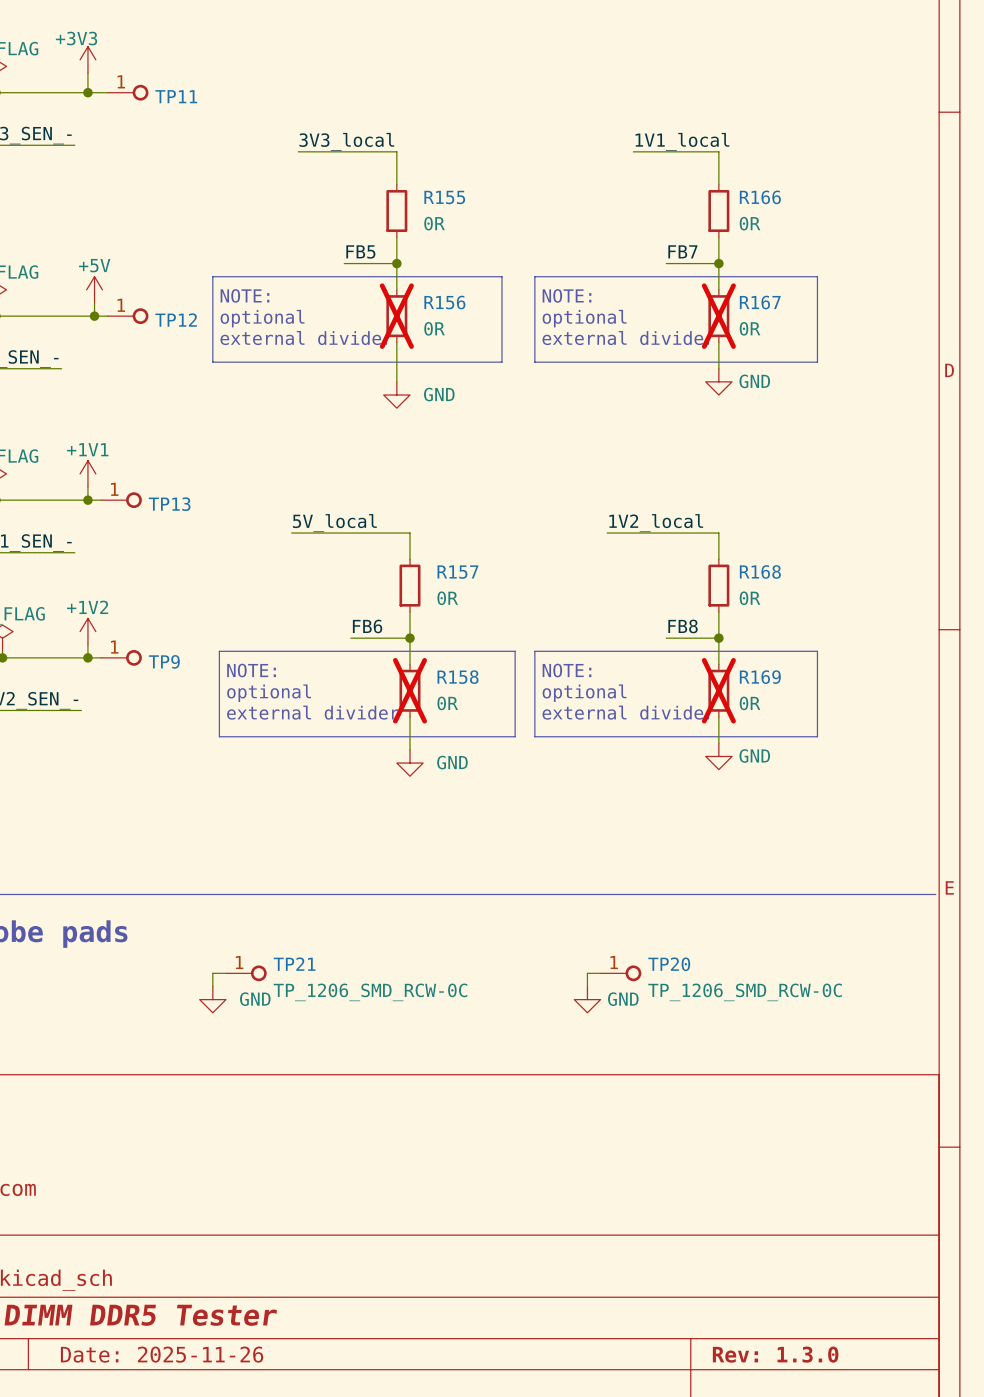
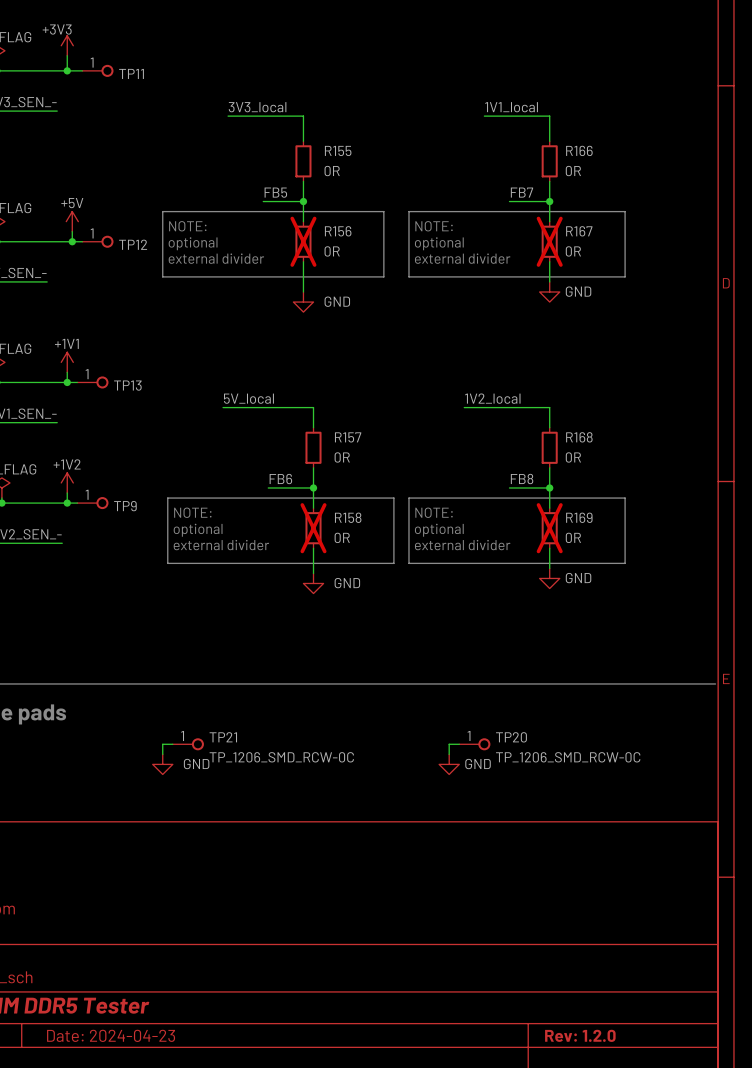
title block: Date: 2025-11-26 (162, 1354) -> Date: 2024-04-23 (111, 1035)
title block: Rev: 1.3.0 (775, 1354) -> Rev: 1.2.0 (580, 1035)

